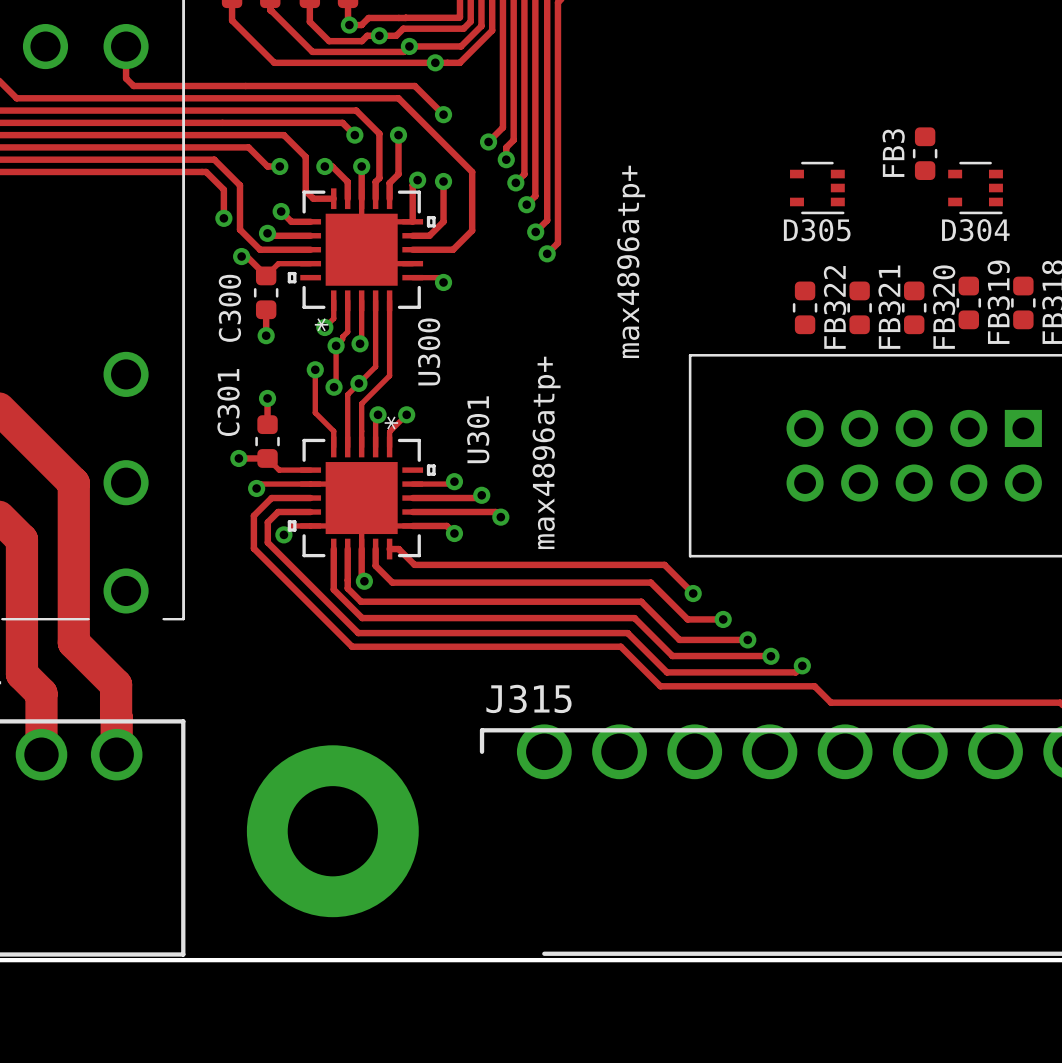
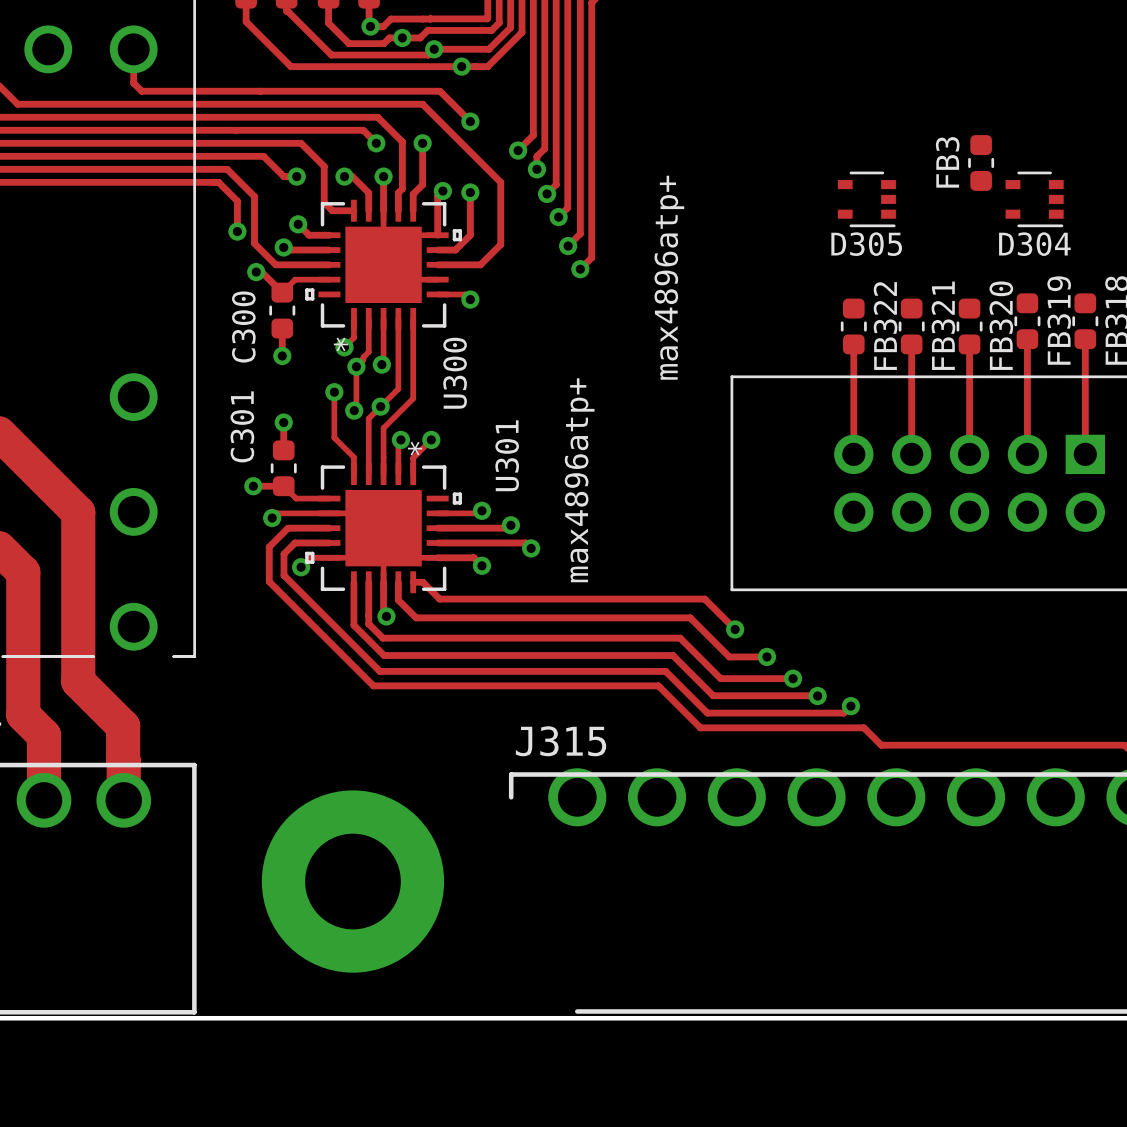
track: none -> (853, 344) (853, 454)
track: none -> (911, 344) (911, 454)
track: none -> (969, 344) (969, 454)
track: none -> (1027, 344) (1027, 454)
track: none -> (1085, 344) (1085, 454)

